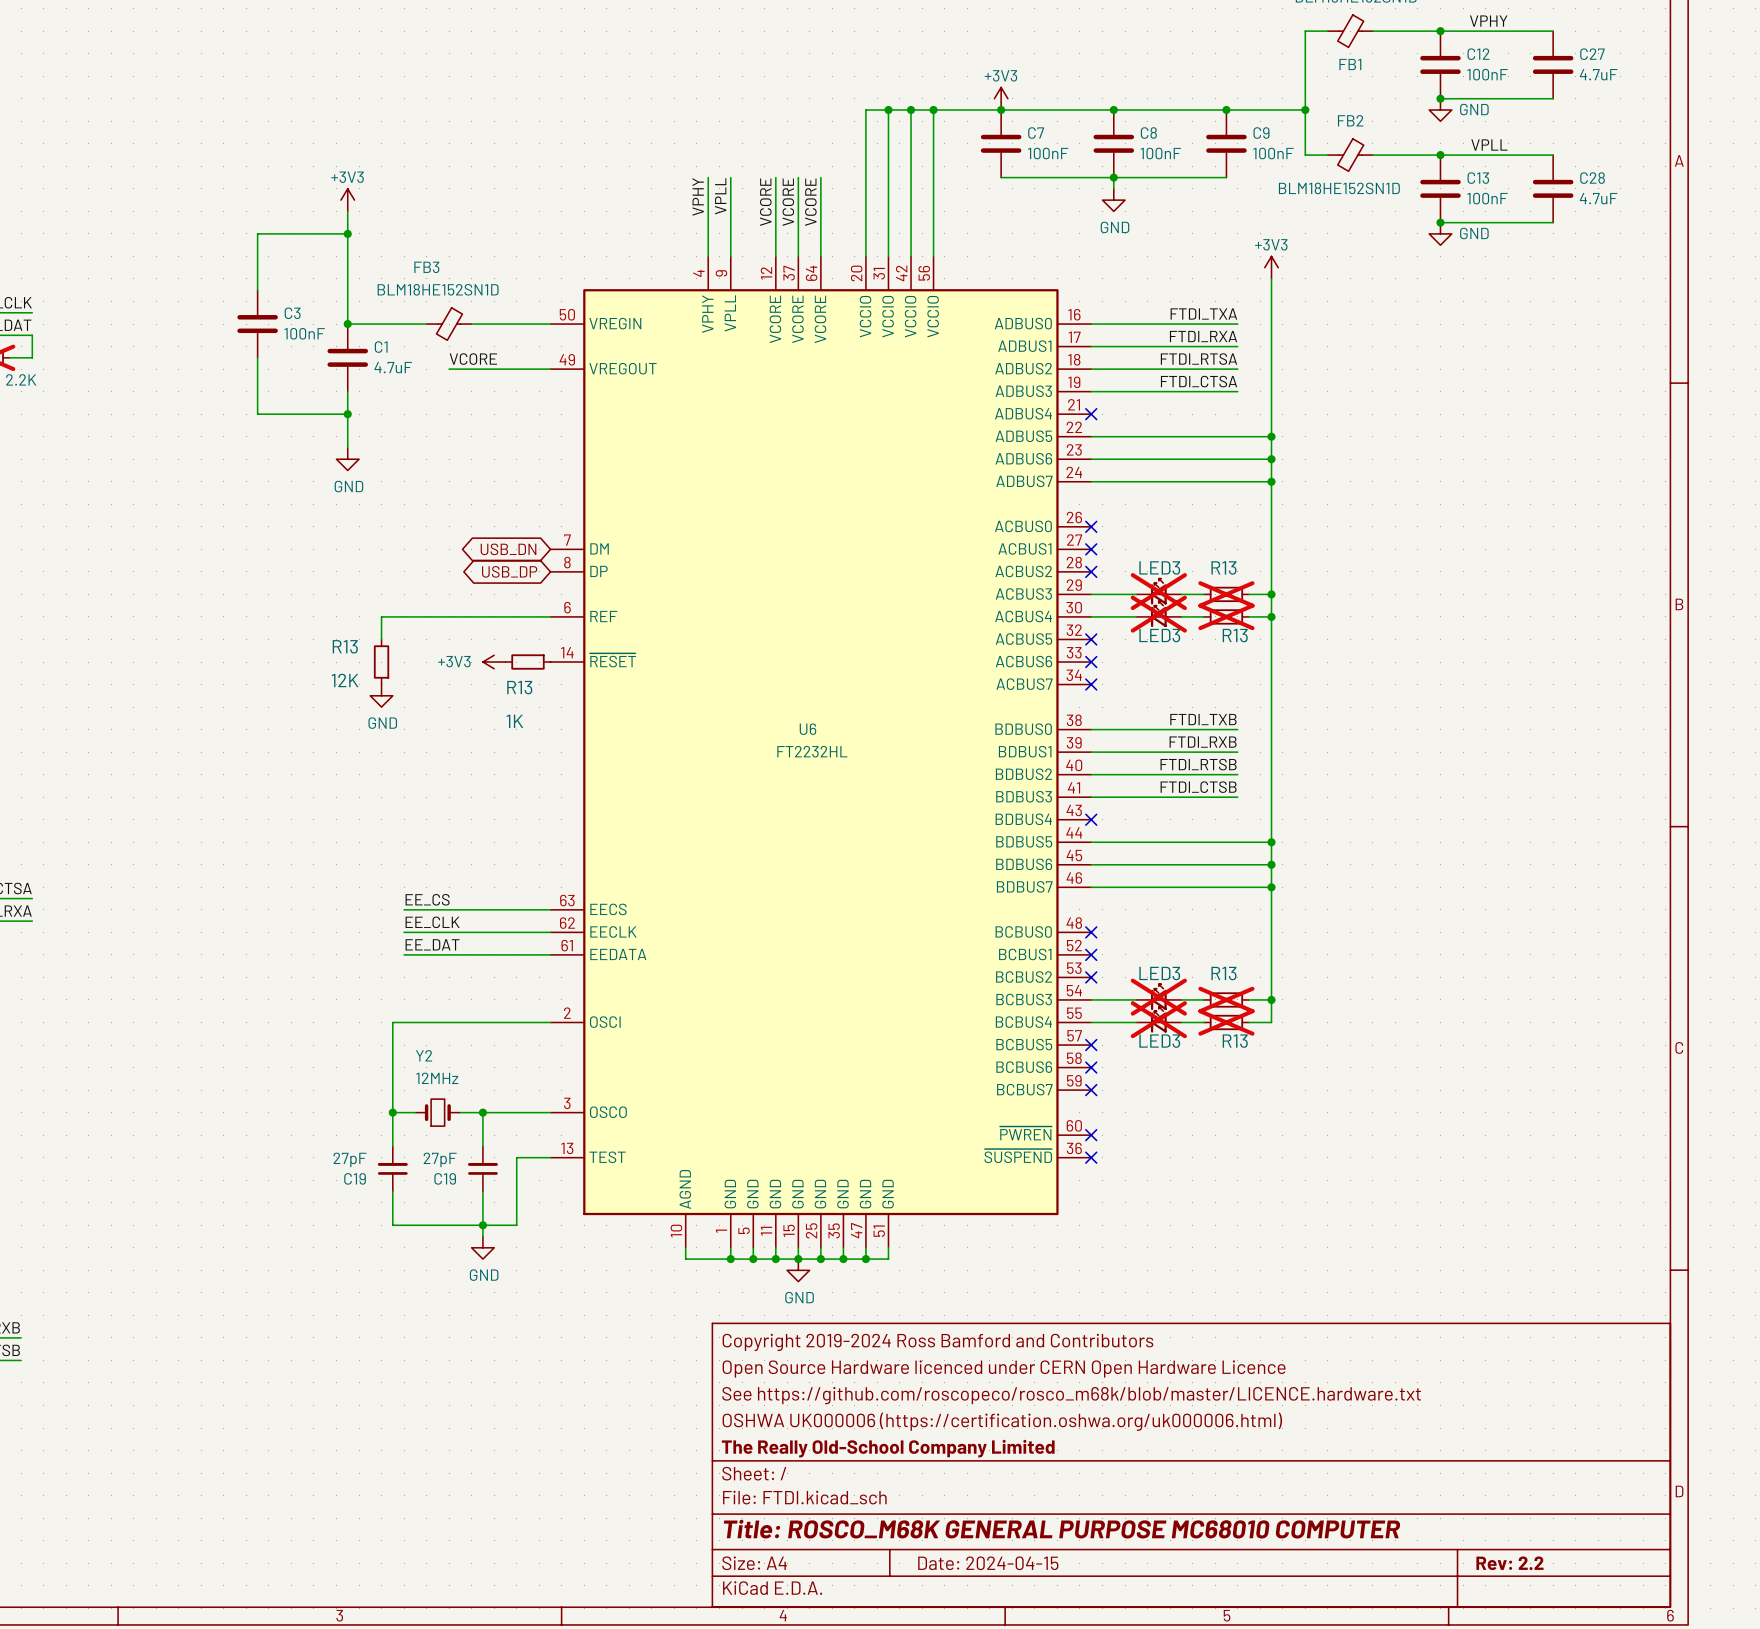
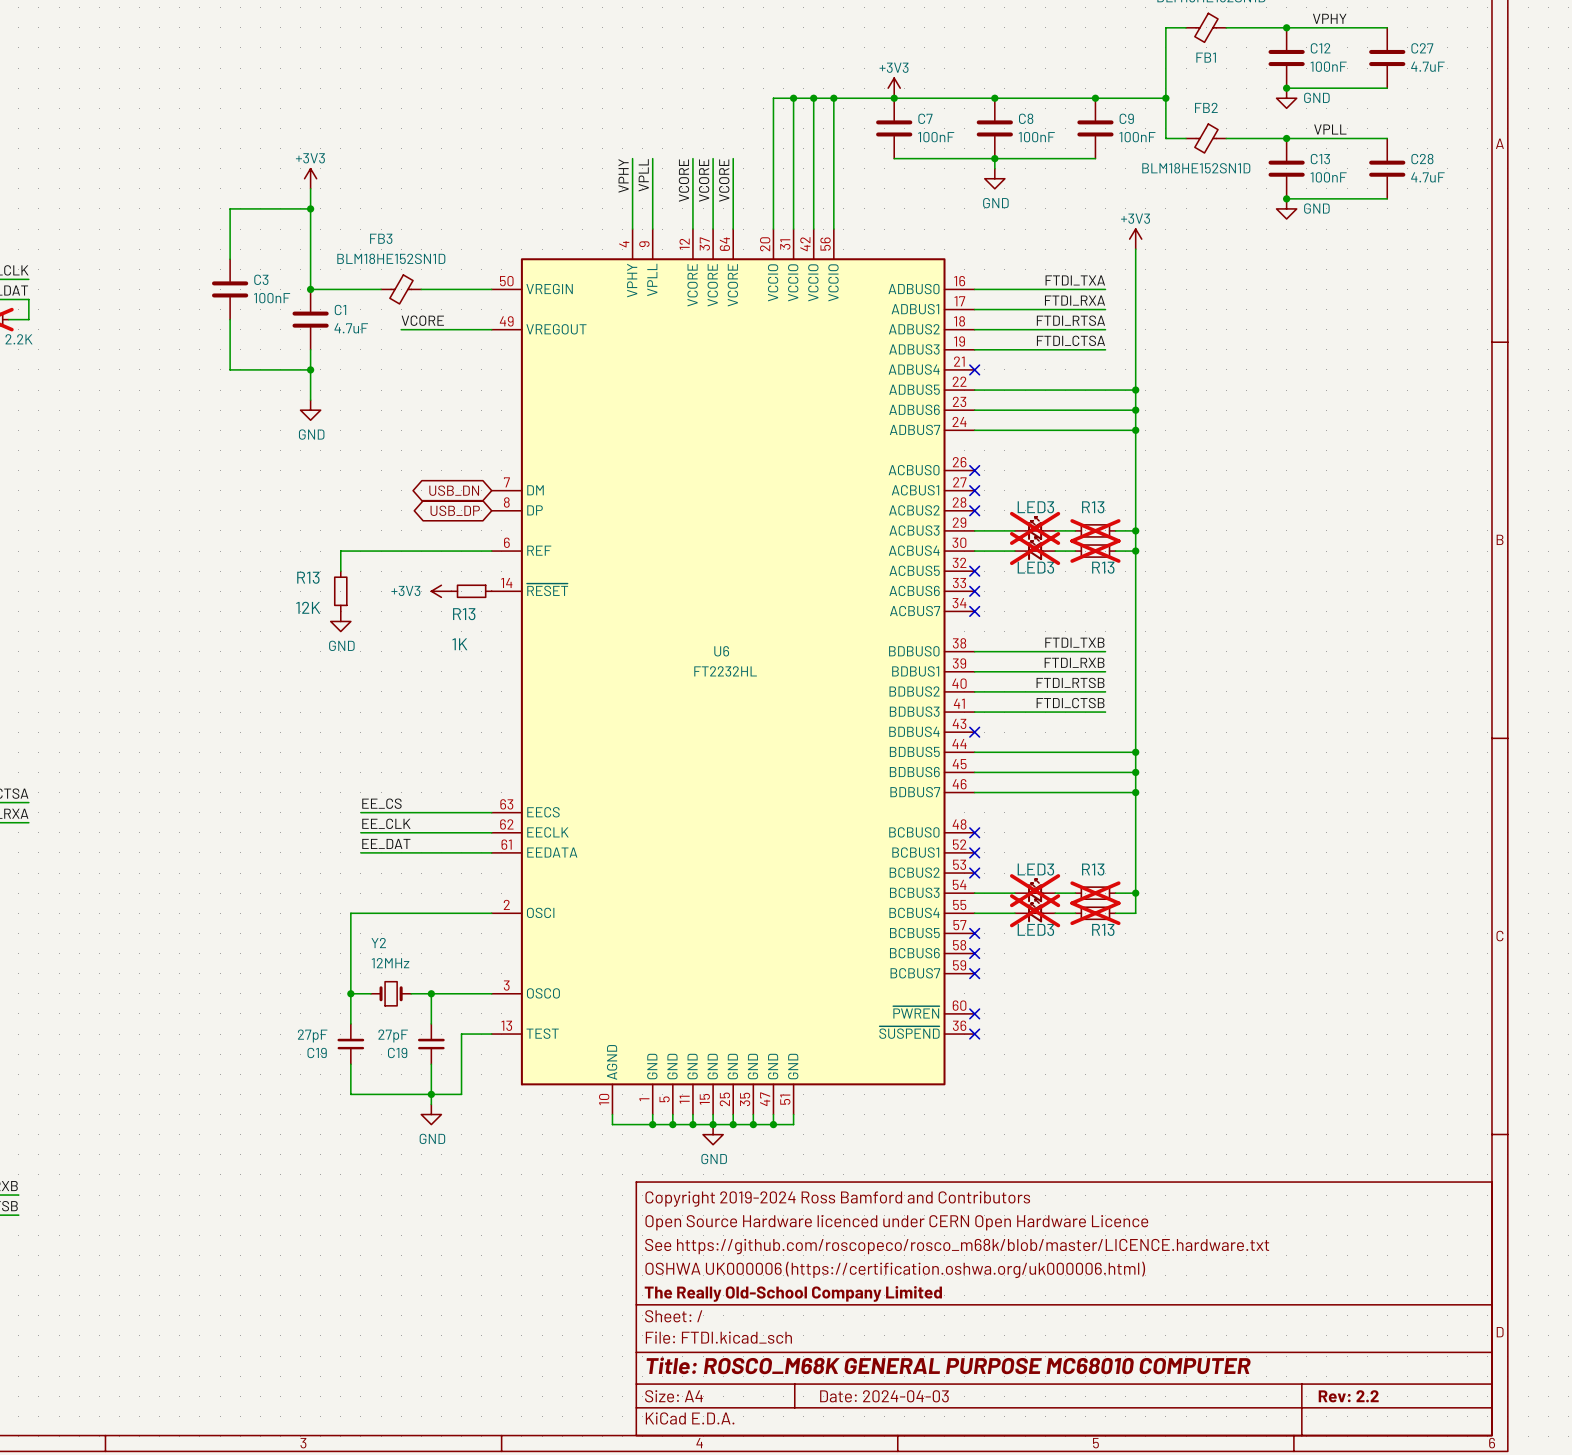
title block: Date: 2024-04-15 (988, 1563) -> Date: 2024-04-03 (884, 1396)

